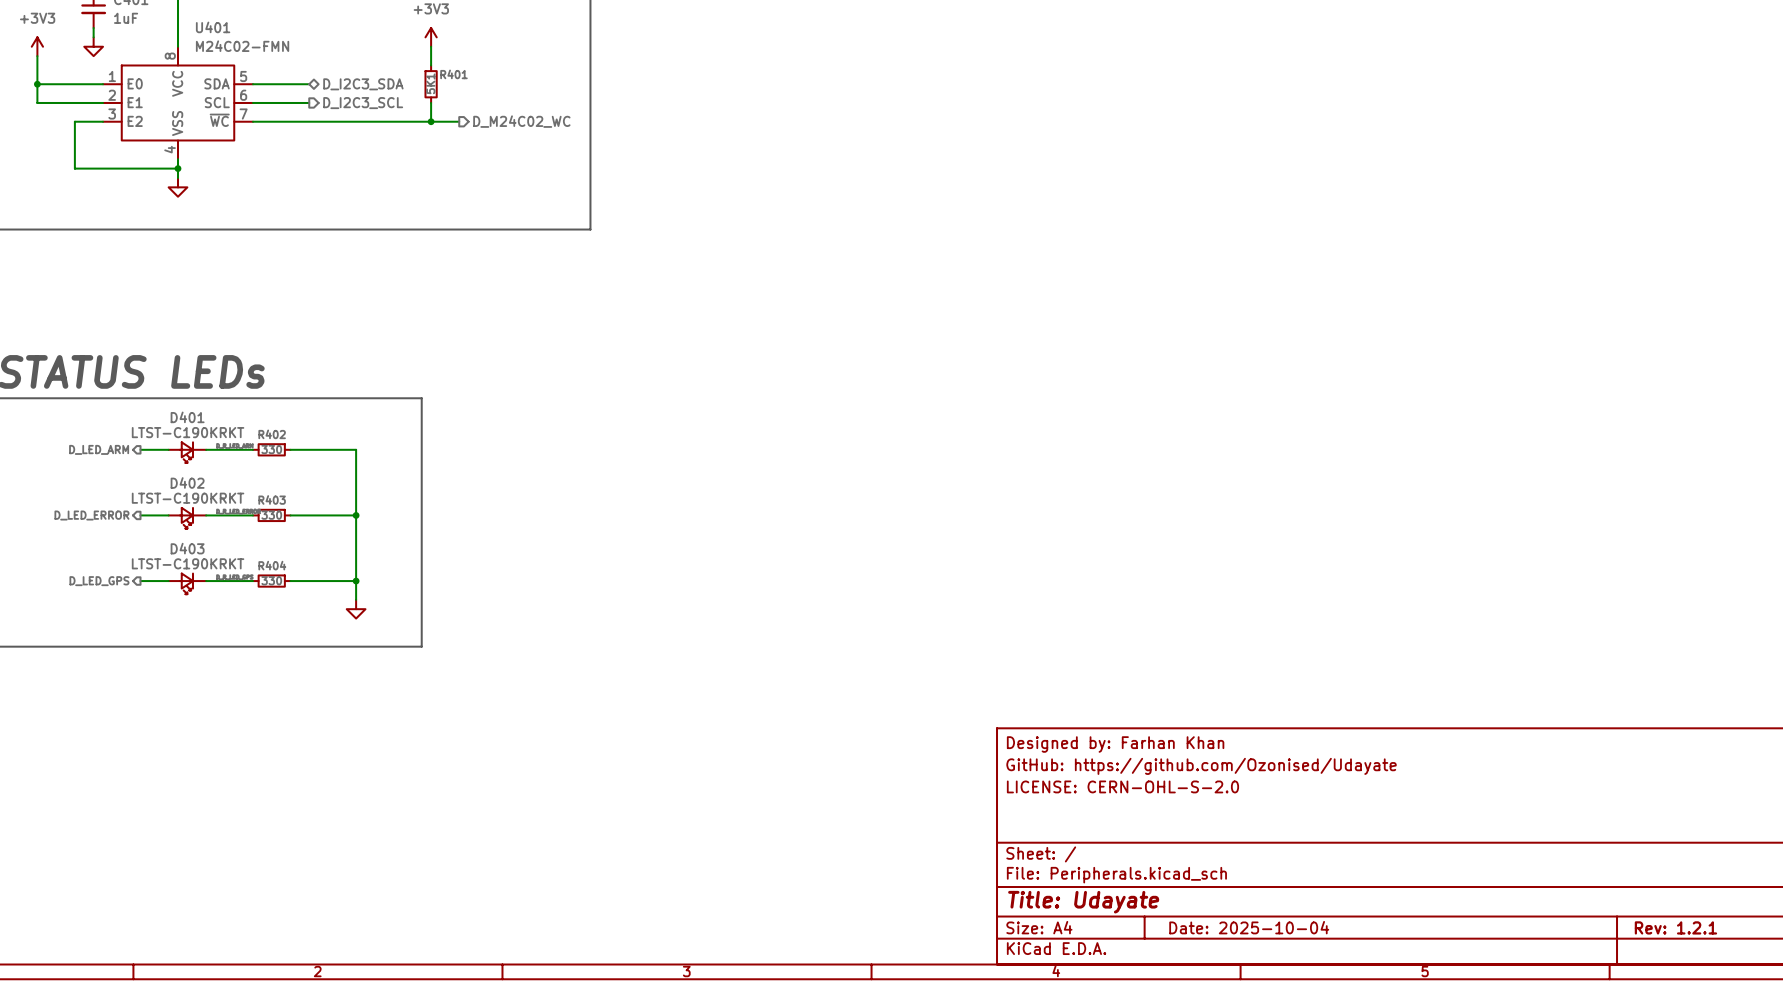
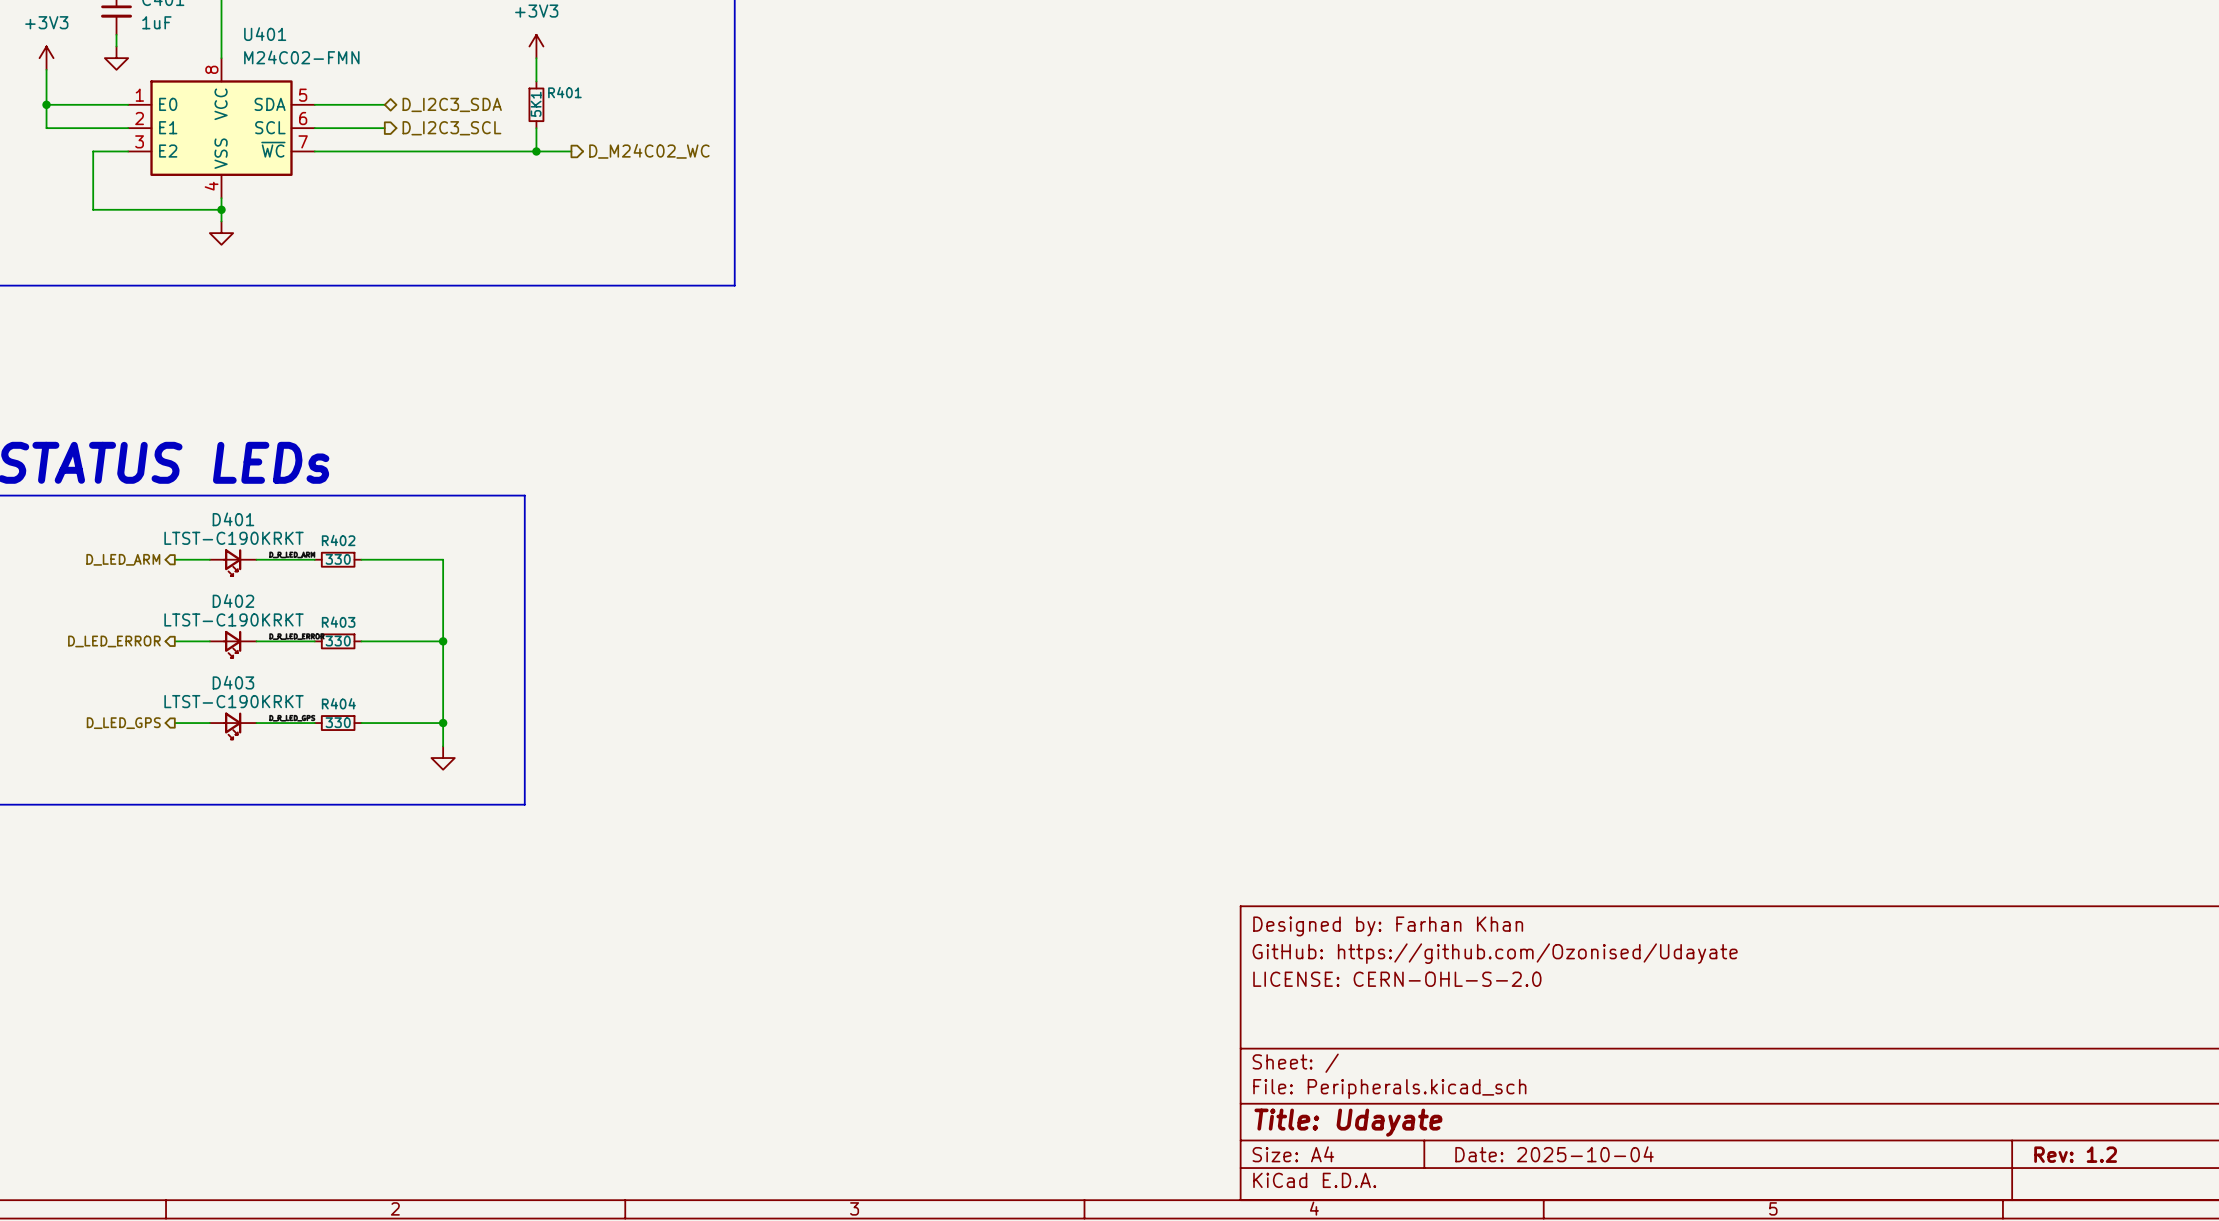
title block: Rev: 1.2.1 (1675, 927) -> Rev: 1.2 (2075, 1154)

